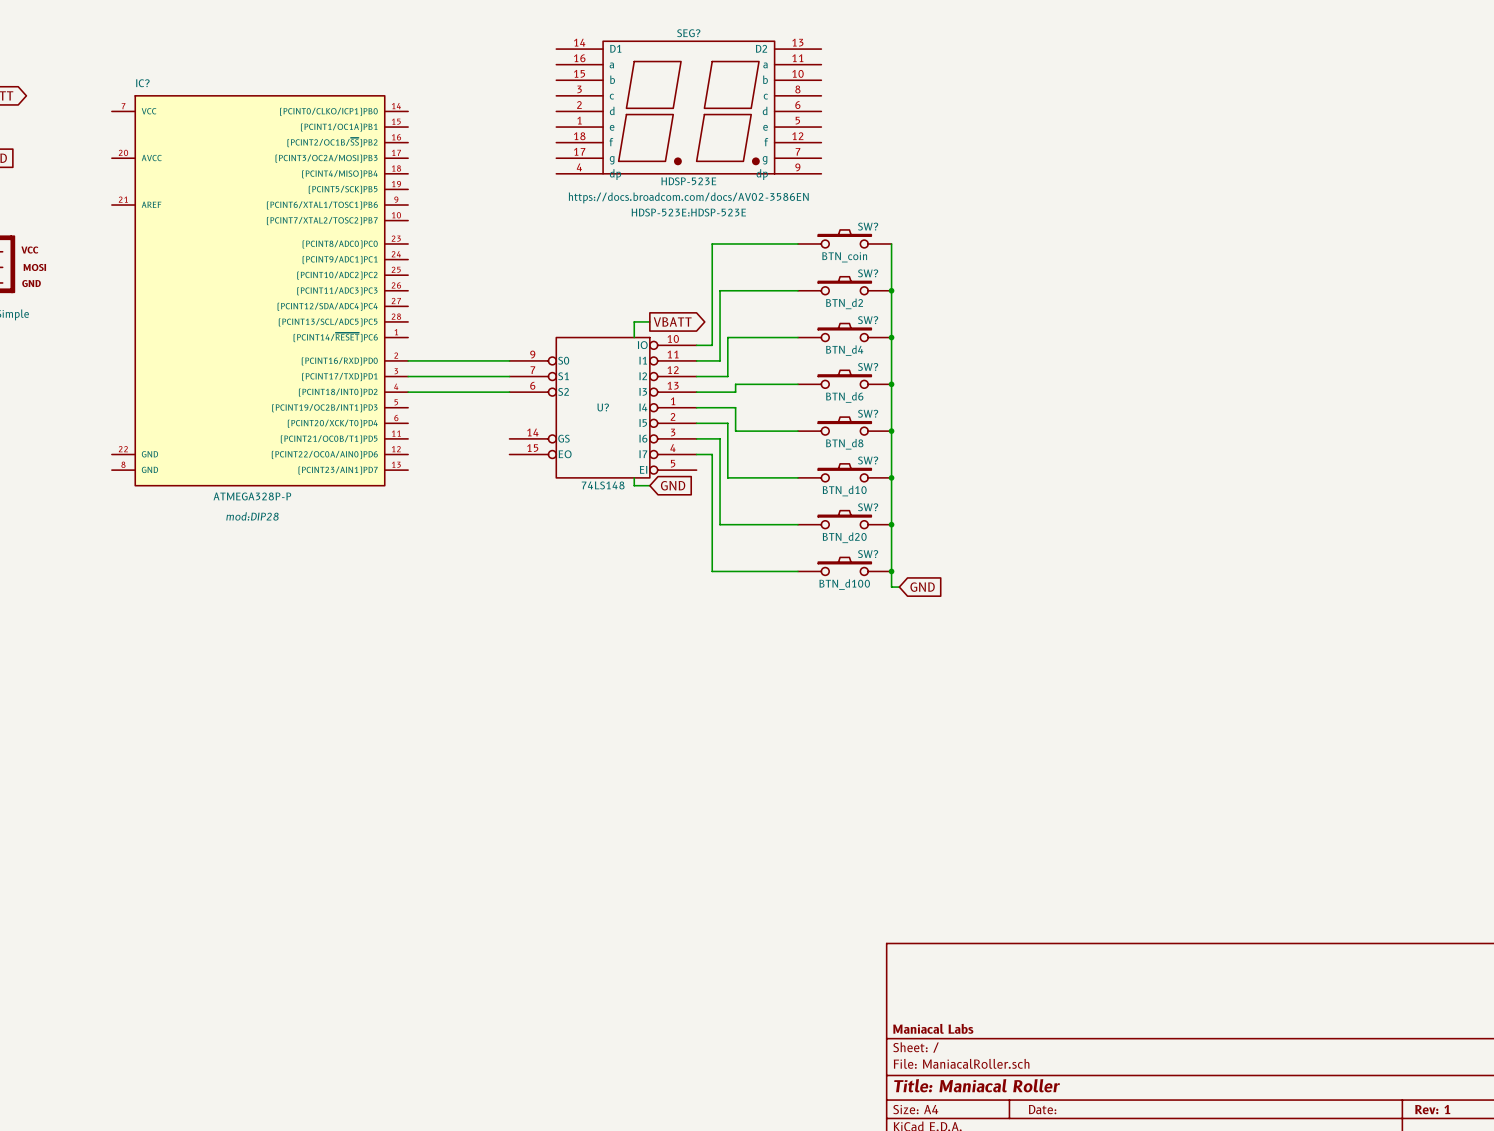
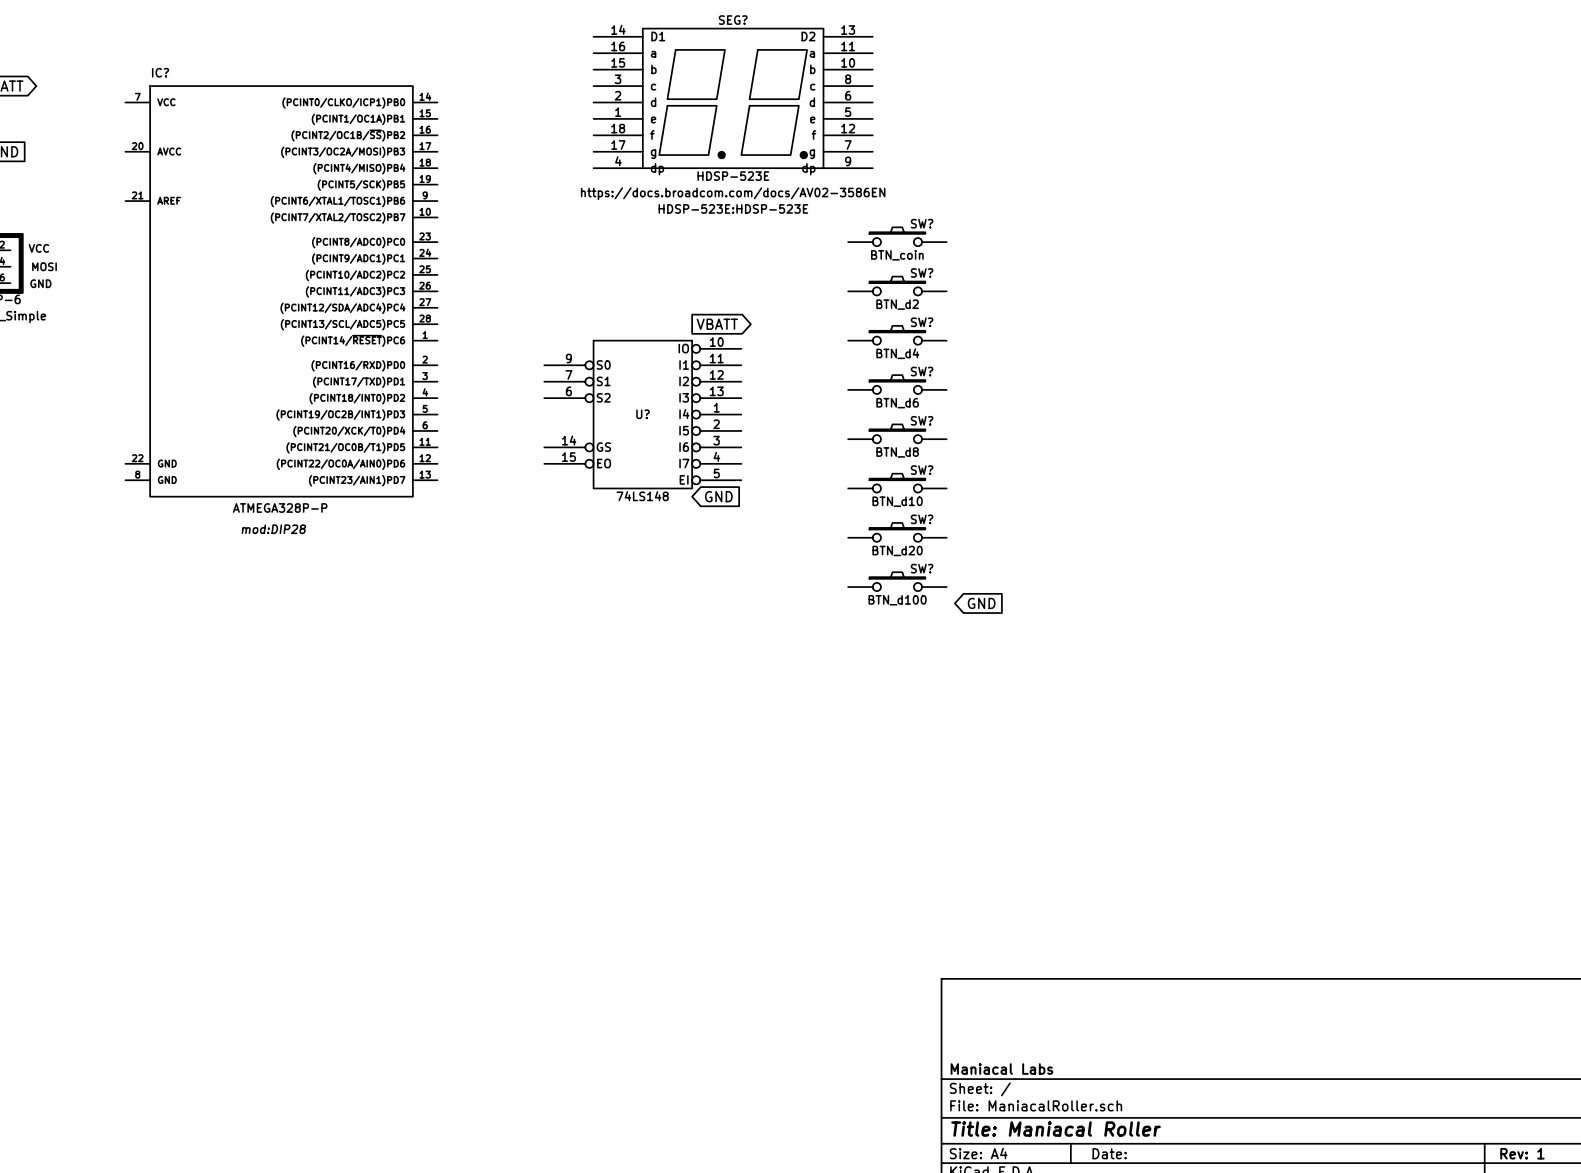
wire: (797, 243) (712, 243) (712, 345) (696, 345) -> none
wire: (891, 243) (891, 587) (899, 587) -> none
wire: (797, 290) (720, 290) (720, 360) (696, 360) -> none
junction: (891, 290) -> none
wire: (649, 321) (634, 321) (634, 337) -> none
wire: (797, 337) (727, 337) (727, 376) (696, 376) -> none
junction: (891, 337) -> none
wire: (408, 360) (509, 360) -> none
wire: (408, 376) (509, 376) -> none
wire: (797, 384) (735, 384) (735, 392) (696, 392) -> none
junction: (891, 384) -> none
wire: (408, 392) (509, 392) -> none
wire: (696, 407) (735, 407) (735, 431) (797, 431) -> none
wire: (696, 423) (727, 423) (727, 477) (797, 477) -> none
junction: (891, 431) -> none
wire: (696, 438) (720, 438) (720, 524) (797, 524) -> none
wire: (696, 454) (712, 454) (712, 571) (797, 571) -> none
wire: (634, 477) (634, 485) (649, 485) -> none
junction: (891, 477) -> none
junction: (891, 524) -> none
junction: (891, 571) -> none

